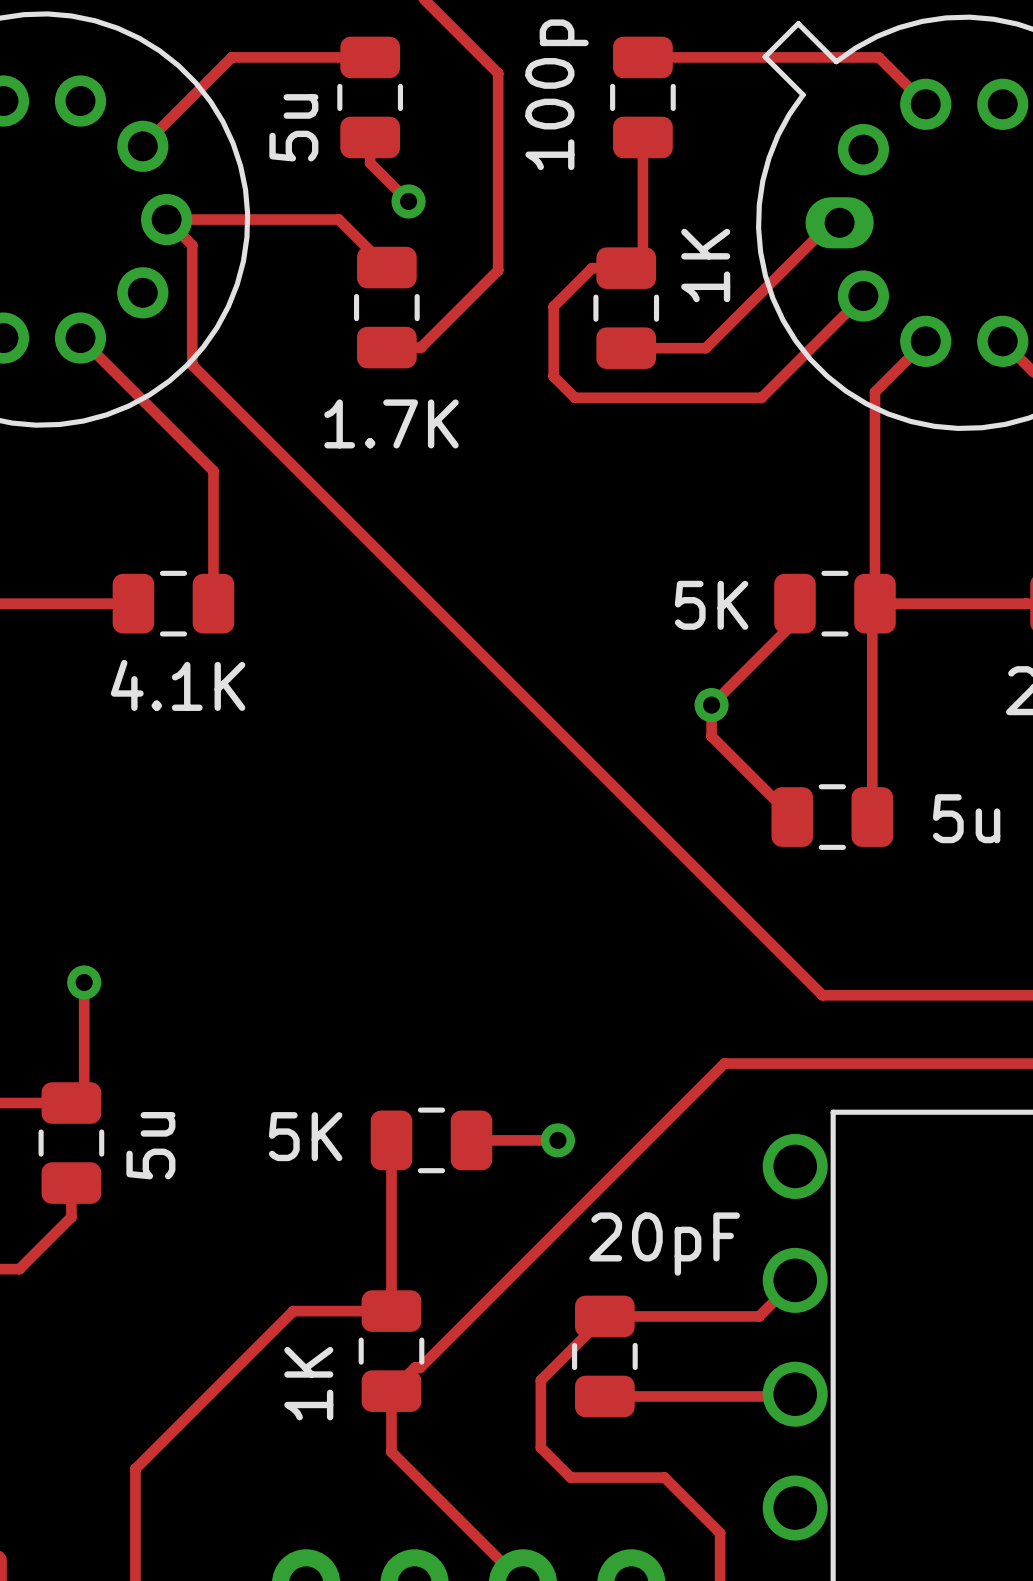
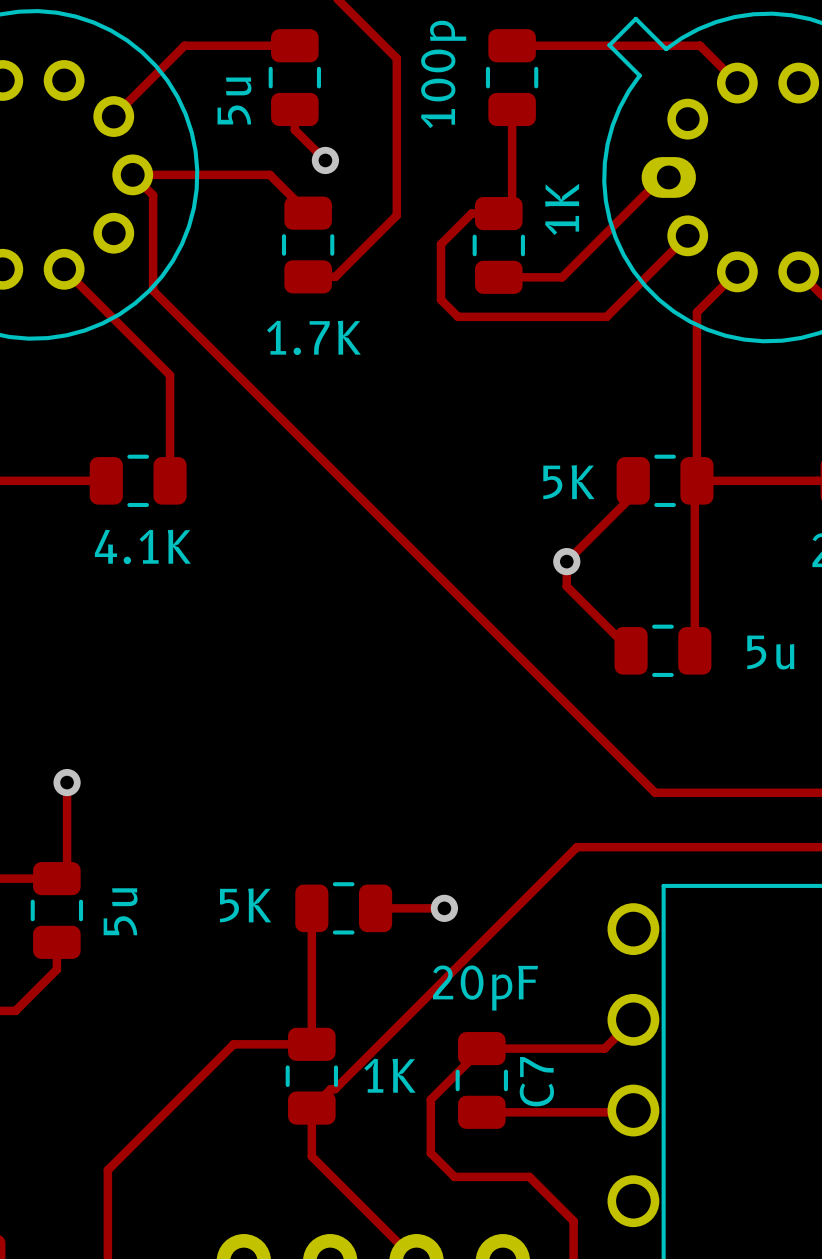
C7 value position: 20pF (664, 1244) -> 20pF (485, 988)
C7 name: none -> C7 (536, 1081)
part value rotation: 0° (308, 1383) -> 90° clockwise (389, 1075)
part value position: 1K (308, 1383) -> 1K (389, 1075)

